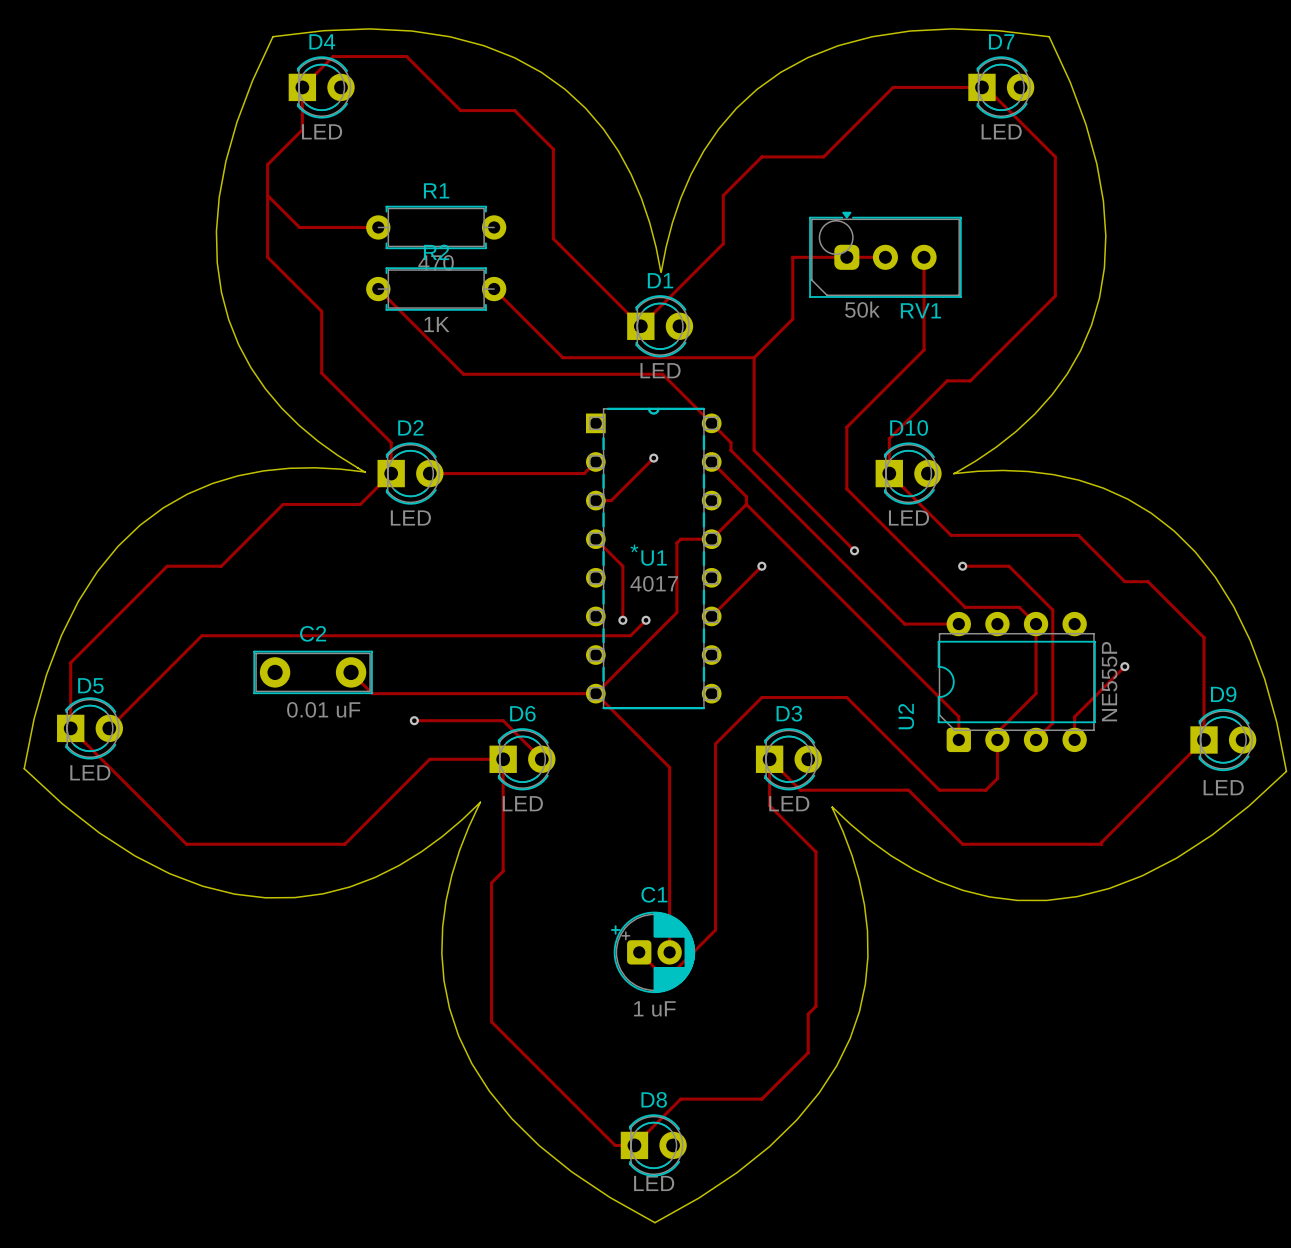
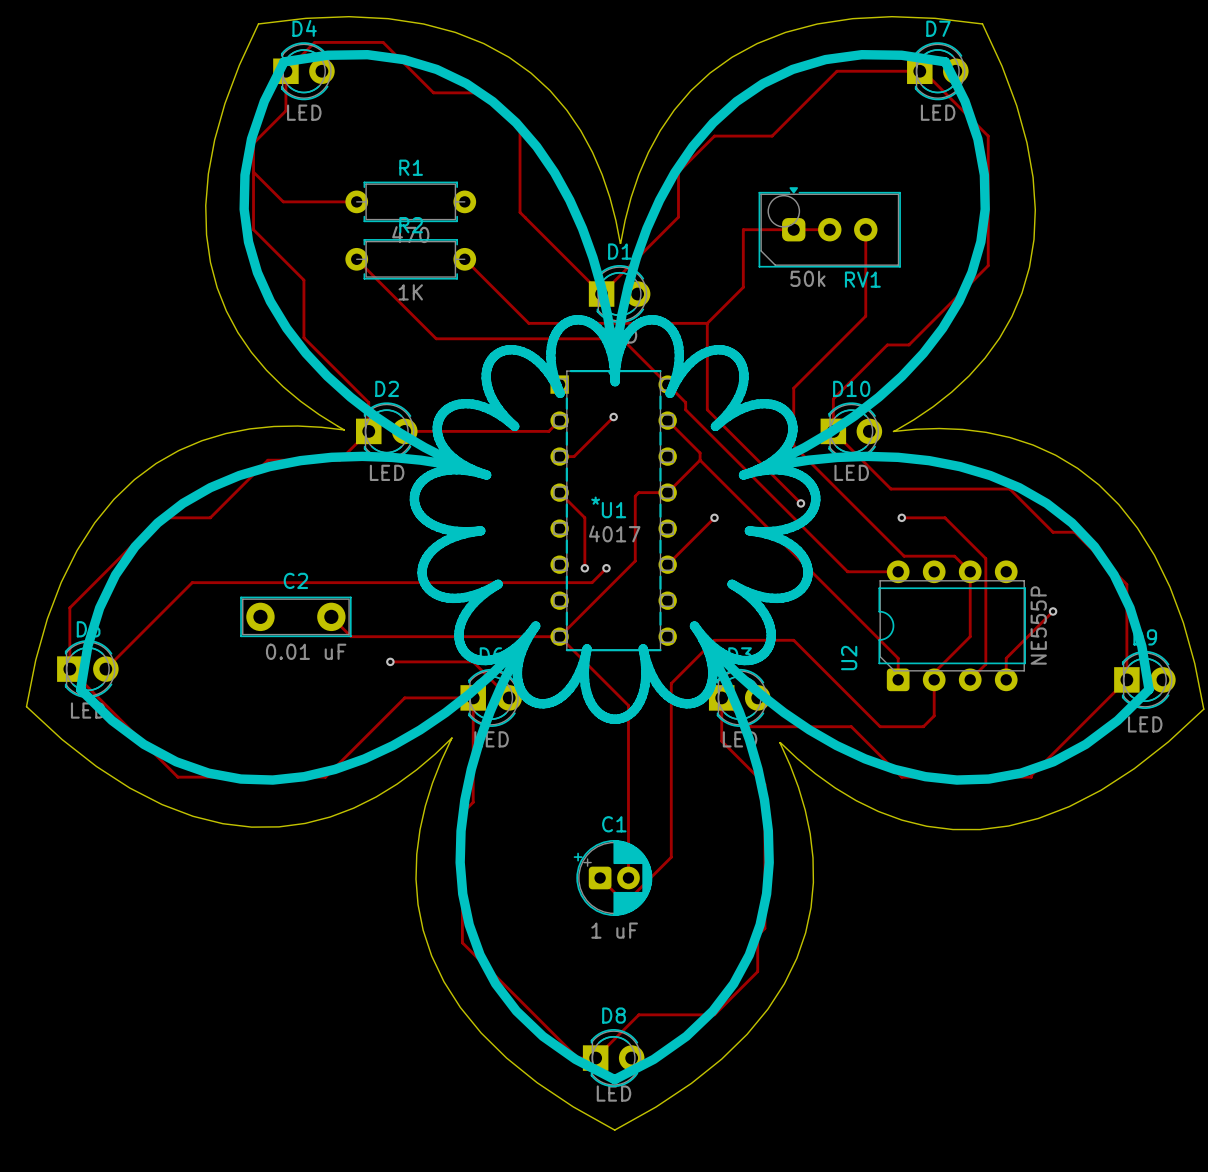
line: none -> (284, 61) (264, 101) (251, 138) (244, 175) (244, 209) (248, 241) (257, 272) (270, 301) (286, 328) (305, 353) (350, 397) (399, 432) (448, 459) (472, 469) (420, 460) (392, 457) (331, 457) (269, 466) (239, 475) (210, 487) (182, 503) (157, 523) (135, 546) (115, 574) (99, 608) (87, 646) (80, 689) (112, 720) (143, 744) (176, 761) (208, 773) (240, 779) (272, 780) (304, 776) (334, 769) (364, 758) (420, 729) (469, 694) (490, 675) (526, 637) (490, 711) (471, 769) (461, 831) (460, 862) (462, 893) (469, 924) (480, 954) (495, 983) (516, 1011) (542, 1036) (575, 1059) (614, 1079) (653, 1059) (686, 1036) (712, 1011) (733, 983) (749, 954) (760, 924) (766, 893) (769, 862) (768, 831) (758, 769) (739, 711) (702, 637) (738, 675) (760, 694) (809, 729) (865, 758) (894, 769) (925, 776) (956, 780) (988, 779) (1021, 773) (1053, 761) (1085, 744) (1117, 720) (1149, 689) (1141, 646) (1130, 608) (1114, 574) (1094, 546) (1071, 523) (1046, 503) (1019, 487) (990, 475) (960, 466) (898, 457) (837, 457) (808, 460) (781, 464) (757, 469) (804, 447) (854, 416) (901, 376) (923, 353) (942, 328) (959, 301) (971, 272) (980, 241) (985, 209) (984, 175) (977, 138) (965, 101) (945, 61) (901, 55) (861, 54) (825, 59) (792, 69) (763, 83) (736, 101) (713, 122) (692, 146) (674, 172) (659, 200) (646, 228) (628, 286) (614, 366) (607, 314) (601, 286) (582, 228) (554, 172) (536, 146) (516, 122) (492, 101) (466, 83) (436, 69) (403, 59) (367, 54) (327, 55) (284, 61)
line: none -> (576, 319) (566, 322) (560, 327) (552, 342) (551, 364) (560, 393) (544, 367) (526, 353) (518, 350) (506, 350) (496, 354) (489, 362) (486, 378) (489, 392) (498, 409) (514, 426) (495, 412) (472, 404) (454, 405) (447, 408) (440, 416) (437, 426) (437, 434) (446, 450) (464, 465) (486, 475) (456, 469) (434, 473) (426, 477) (418, 486) (414, 496) (415, 507) (425, 520) (438, 527) (456, 531) (480, 530) (457, 535) (435, 547) (424, 561) (422, 576) (426, 586) (431, 591) (447, 597) (469, 596) (498, 584) (478, 598) (463, 617) (458, 635) (459, 643) (465, 652) (474, 658) (481, 660) (499, 657) (519, 644) (535, 626) (523, 646) (518, 665) (517, 680) (524, 695) (533, 701) (543, 703) (555, 700) (562, 695) (576, 678) (587, 648) (584, 679) (590, 701) (601, 714) (608, 718) (618, 718) (632, 712) (641, 696) (645, 672) (643, 648) (650, 671) (660, 688) (671, 698) (686, 703) (697, 701) (705, 695) (711, 684) (712, 675) (709, 653) (694, 626) (710, 644) (730, 657) (748, 660) (756, 658) (764, 652) (770, 643) (771, 635) (766, 617) (751, 598) (732, 584) (760, 596) (782, 597) (791, 595) (801, 589) (806, 579) (807, 569) (801, 554) (789, 544) (772, 535) (749, 530) (773, 531) (796, 525) (810, 513) (814, 507) (815, 496) (812, 486) (807, 480) (790, 471) (766, 470) (743, 475) (771, 462) (787, 446) (791, 438) (792, 426) (789, 416) (782, 408) (766, 403) (751, 405) (734, 412) (715, 426) (731, 409) (742, 387) (743, 369) (740, 362) (733, 354) (723, 350) (715, 349) (698, 356) (681, 372) (670, 393) (678, 364) (677, 342) (674, 333) (666, 324) (657, 320) (646, 320) (632, 328) (623, 340) (617, 358) (615, 381) (612, 358) (604, 335) (591, 323) (576, 319)

